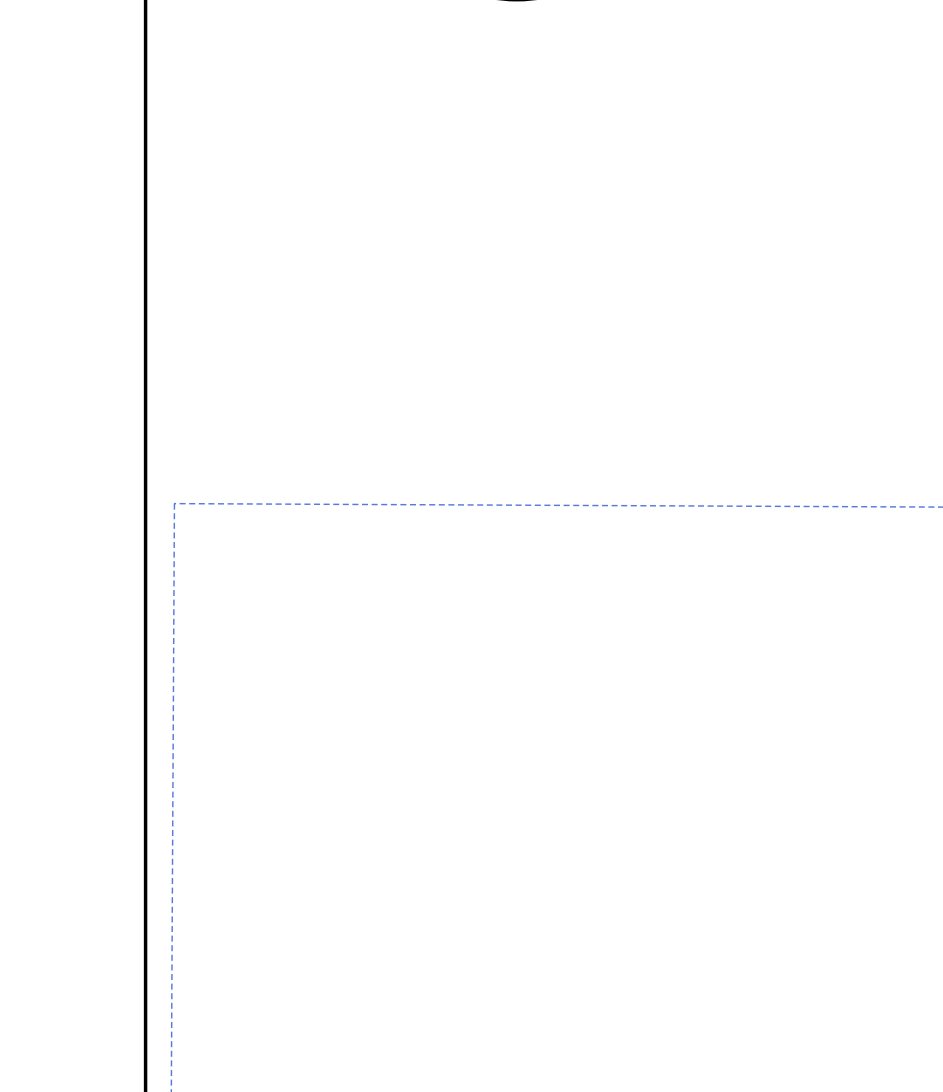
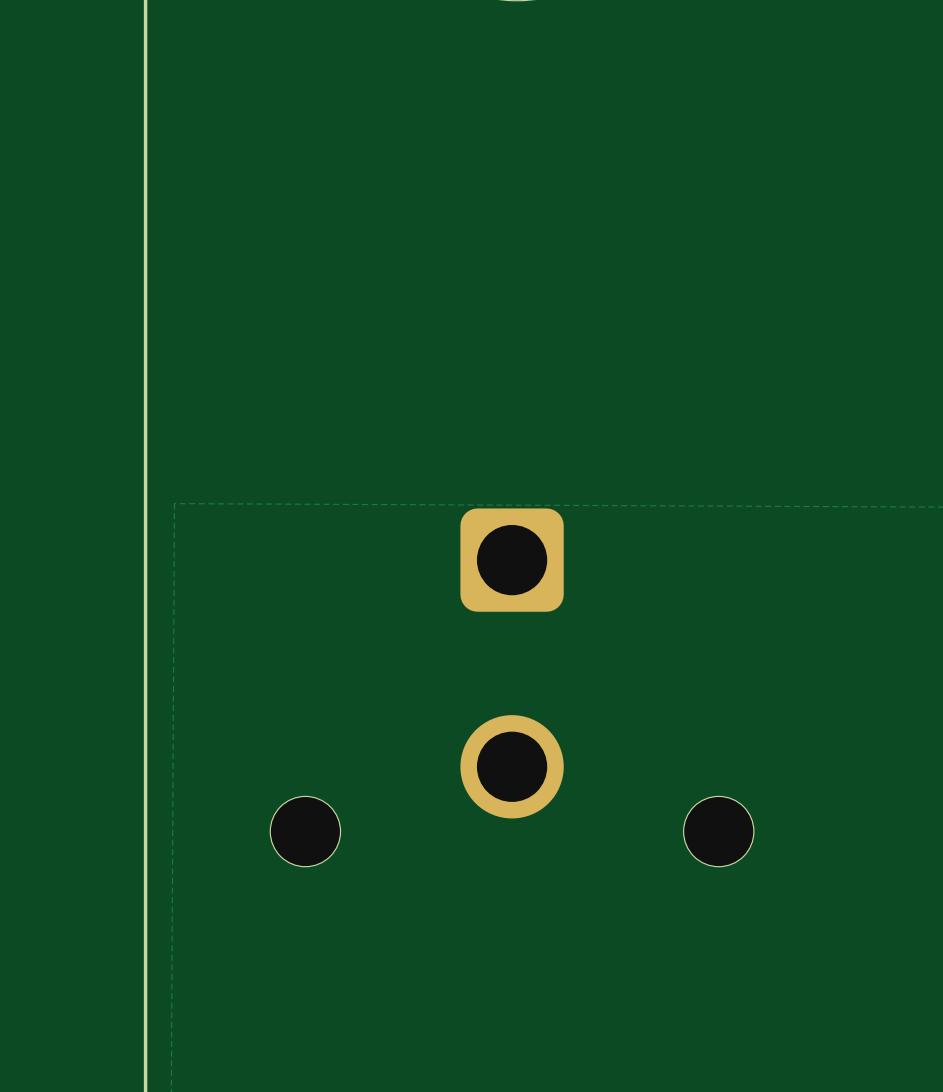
part: none -> (512, 687)

